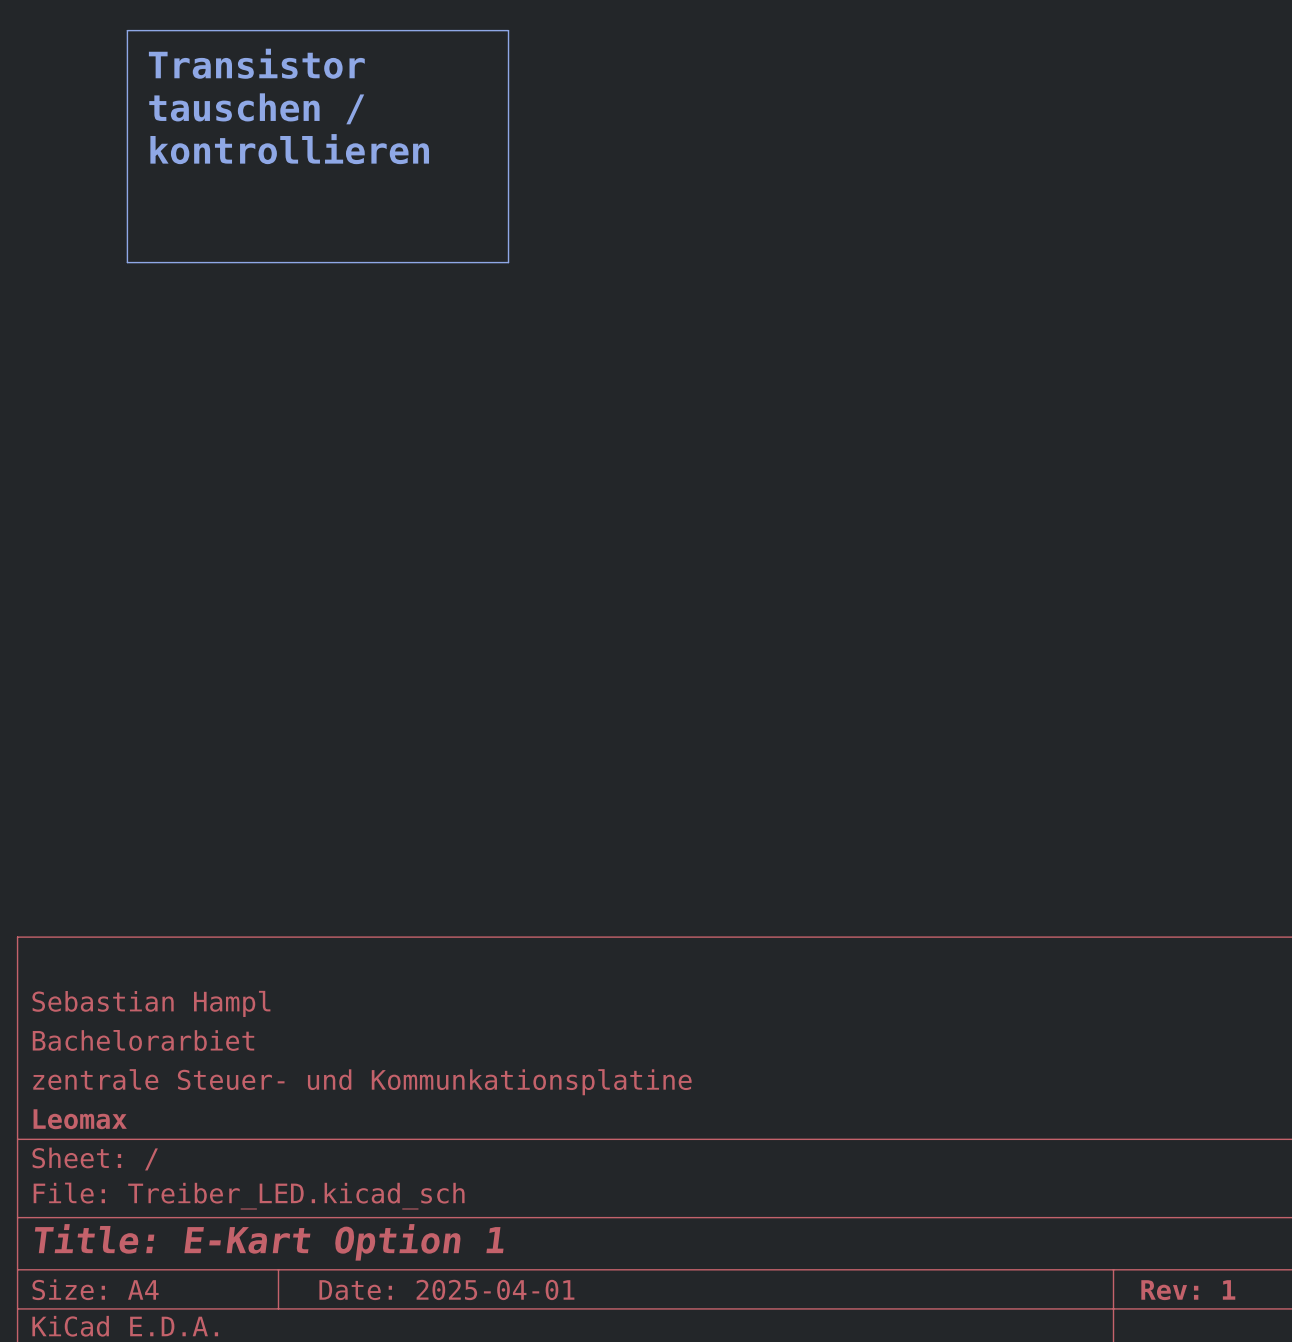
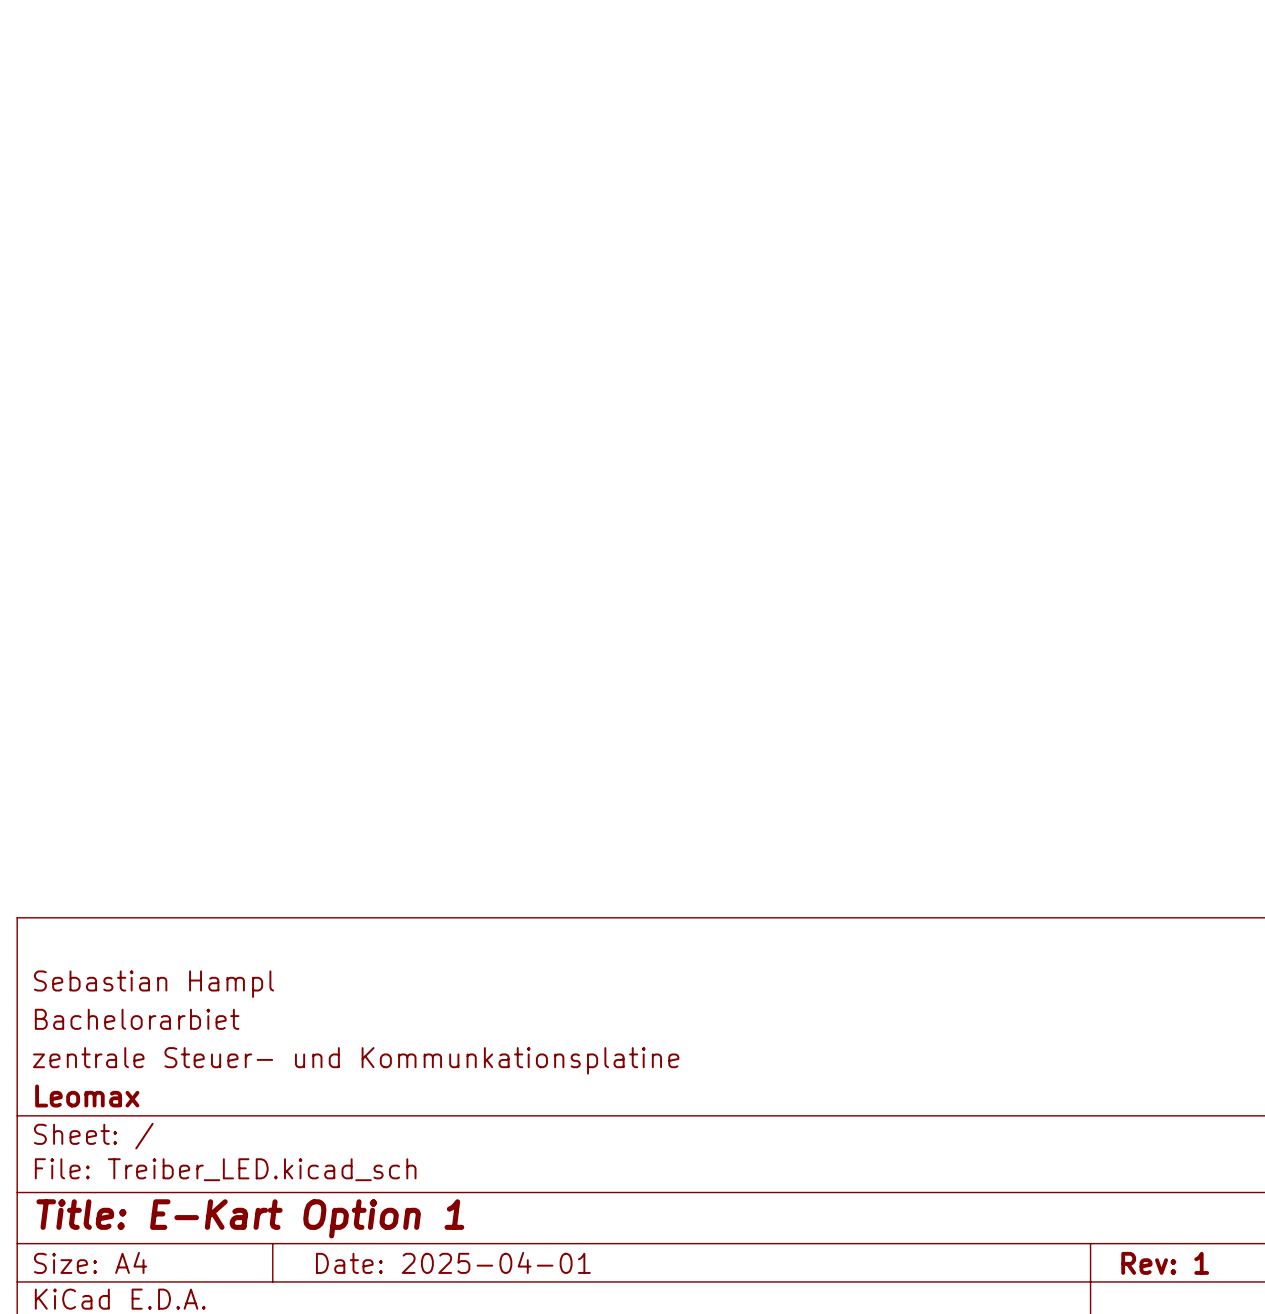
line: (127, 30) (508, 30) (508, 262) (127, 262) (127, 30) -> none
text: Transistor (256, 63) -> none
text: tauschen / (256, 108) -> none
text: kontrollieren (289, 149) -> none

